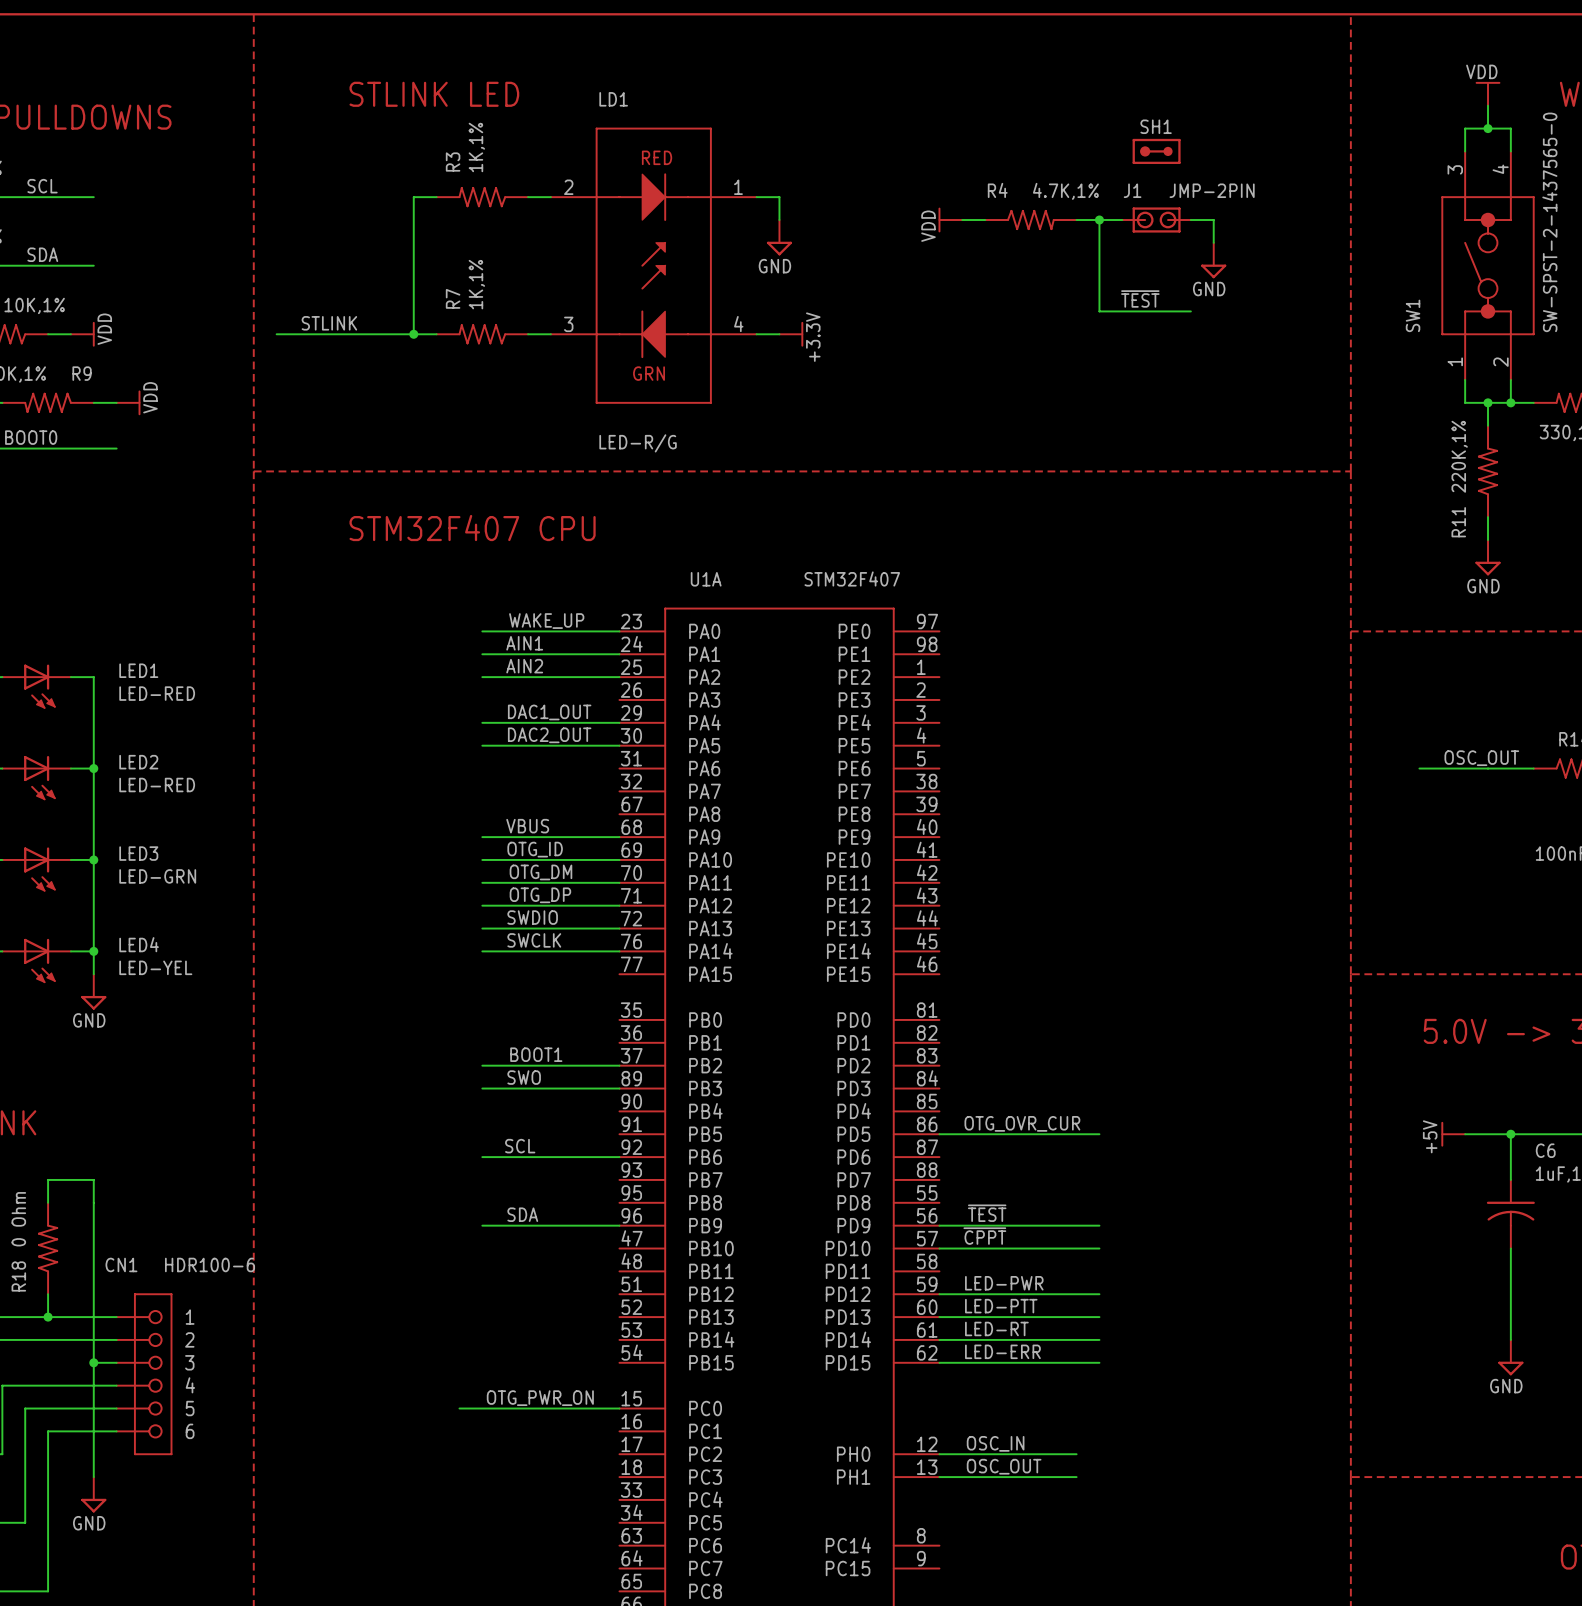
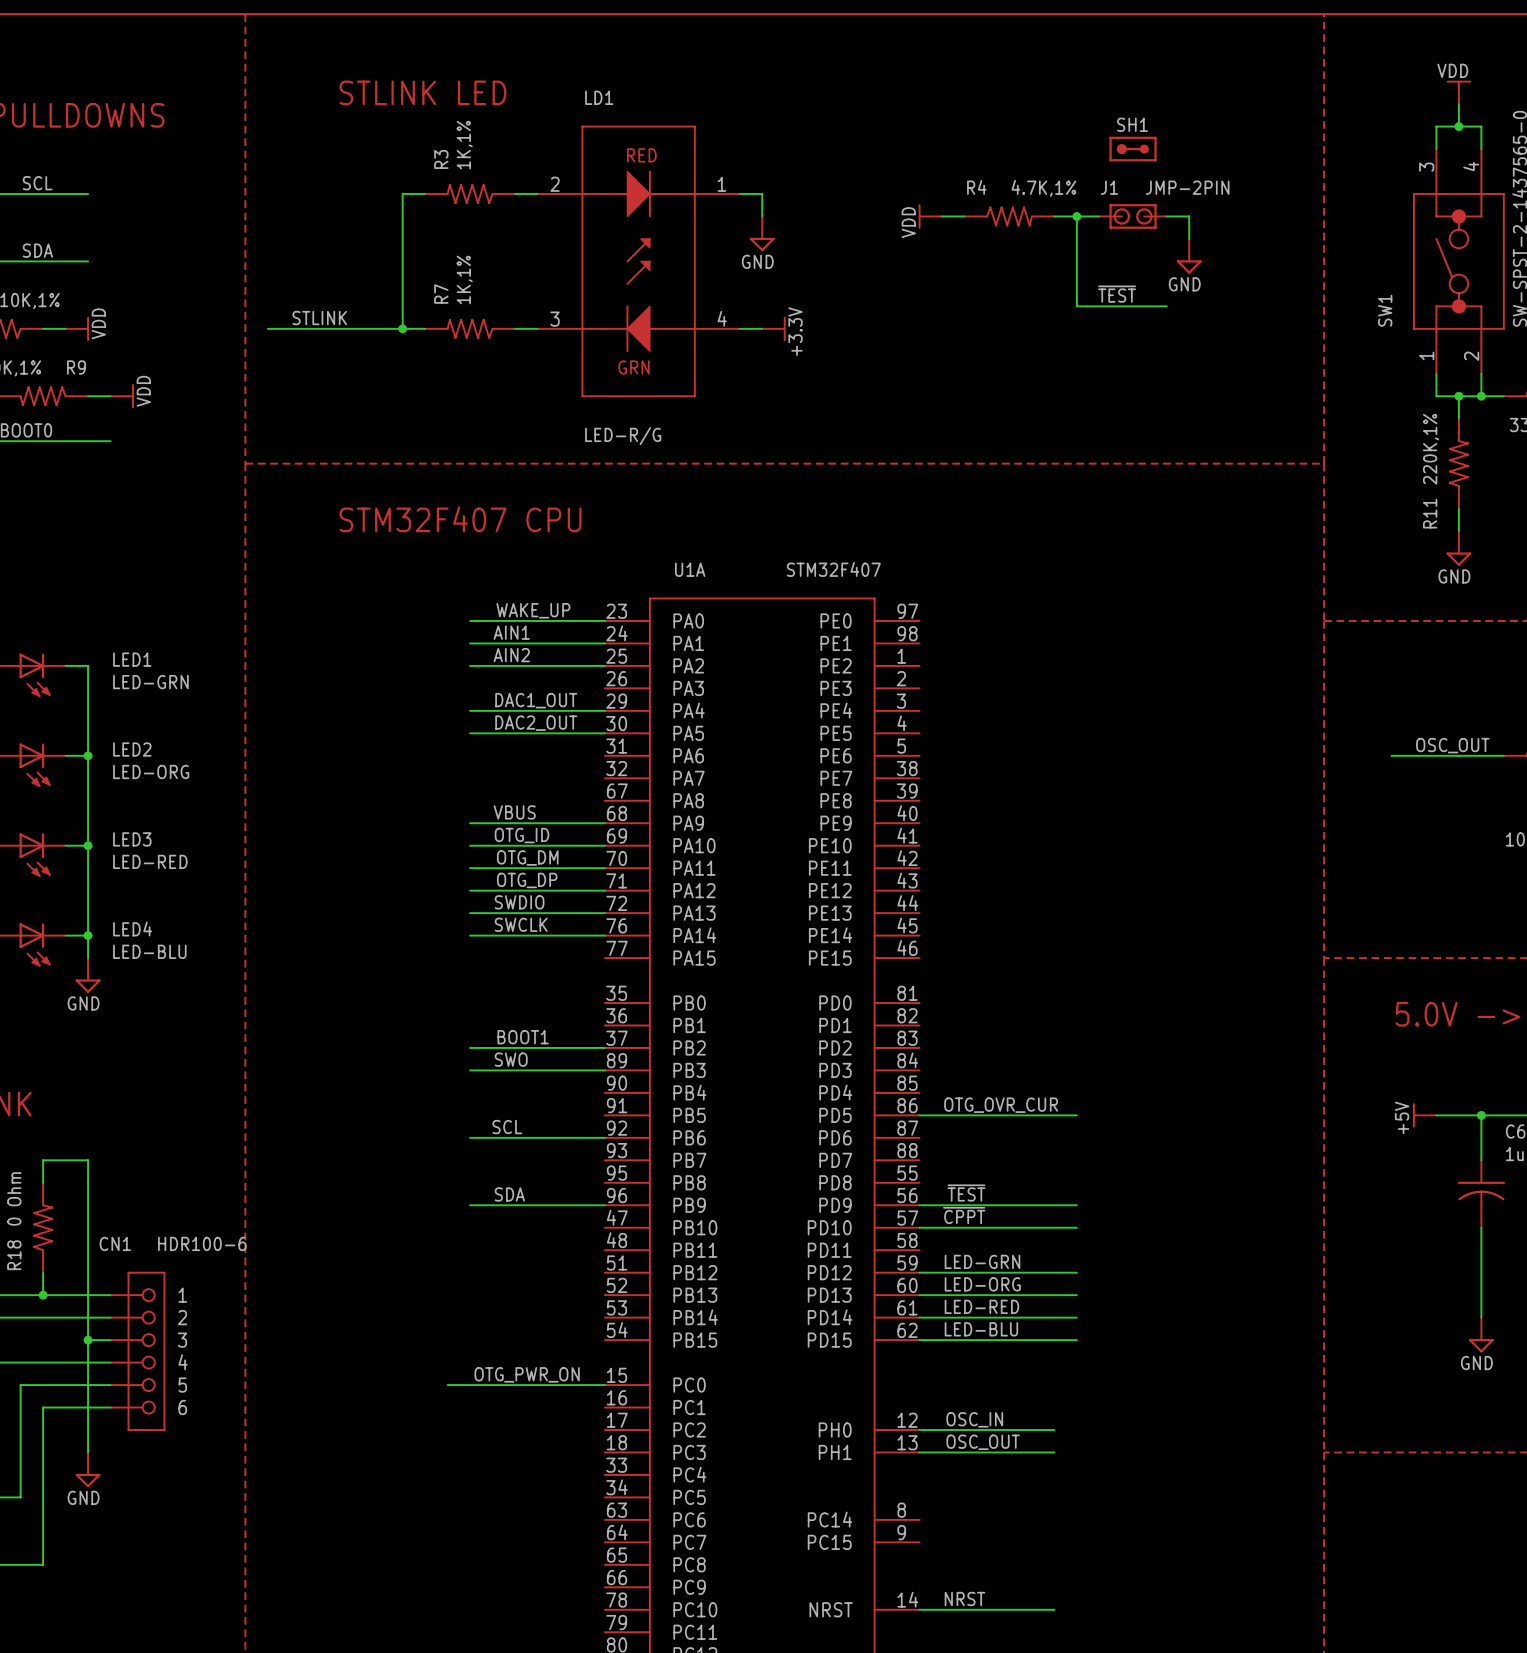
LED1 value: LED-RED (157, 693) -> LED-GRN (150, 682)
LED2 value: LED-RED (157, 785) -> LED-ORG (151, 771)
LED3 value: LED-GRN (157, 876) -> LED-RED (150, 861)
LED4 value: LED-YEL (155, 967) -> LED-BLU (149, 951)
label: LED-PWR (1004, 1283) -> LED-GRN (982, 1261)
label: LED-PTT (1001, 1306) -> LED-ORG (982, 1284)
label: LED-RT (996, 1328) -> LED-RED (981, 1306)
label: LED-ERR (1002, 1351) -> LED-BLU (981, 1329)

